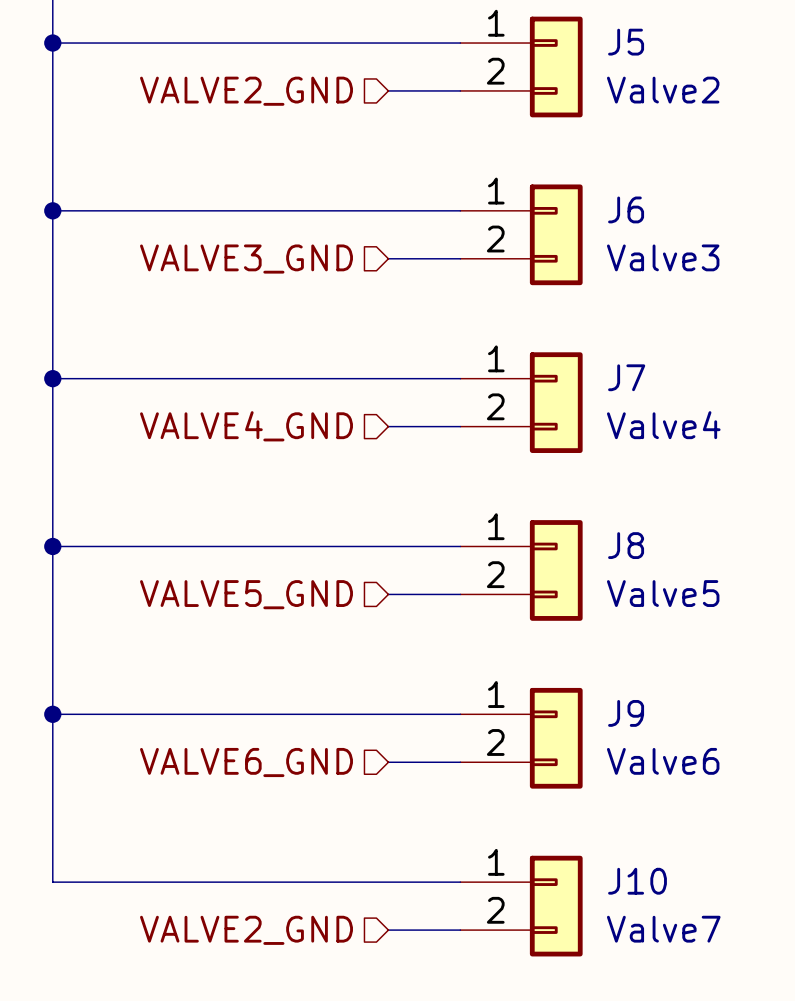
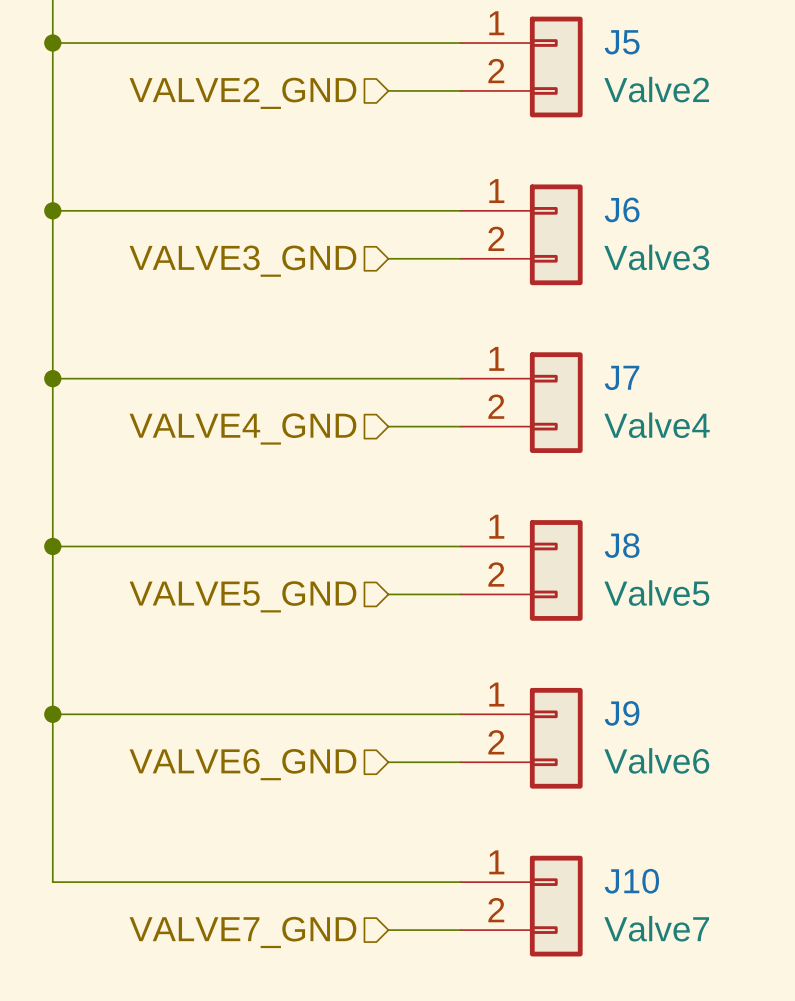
hierarchical label: VALVE2_GND (246, 930) -> VALVE7_GND (242, 932)

